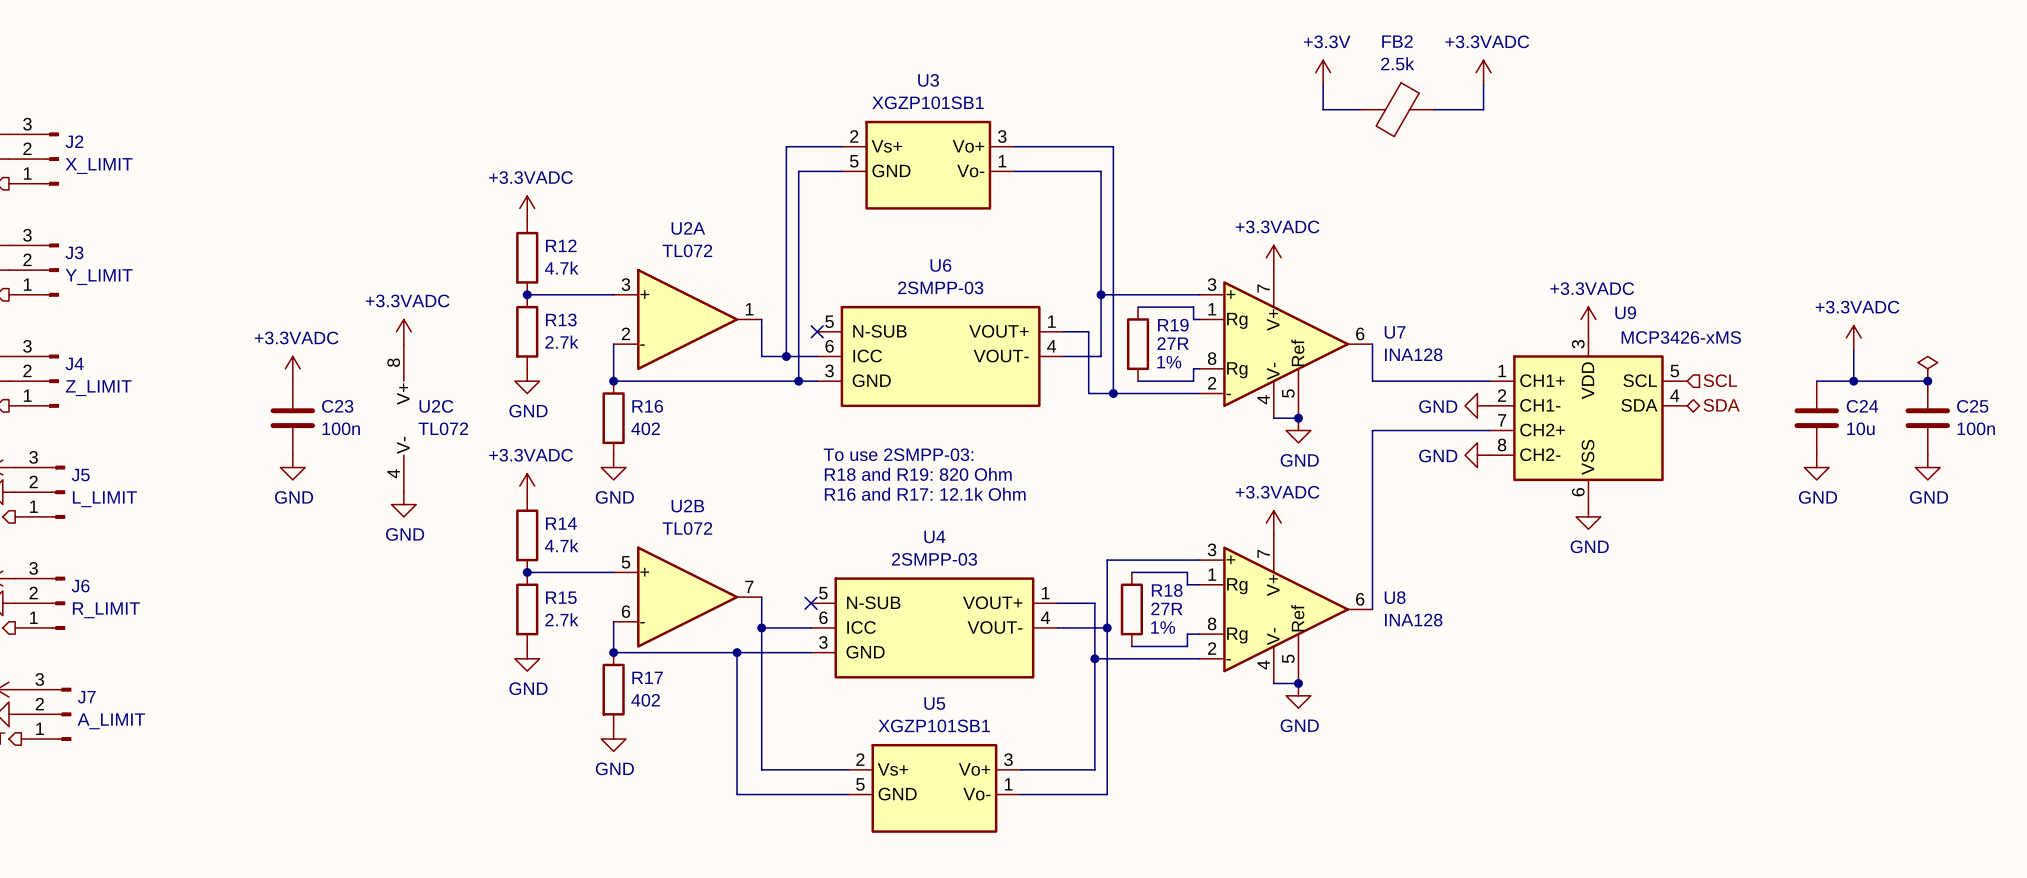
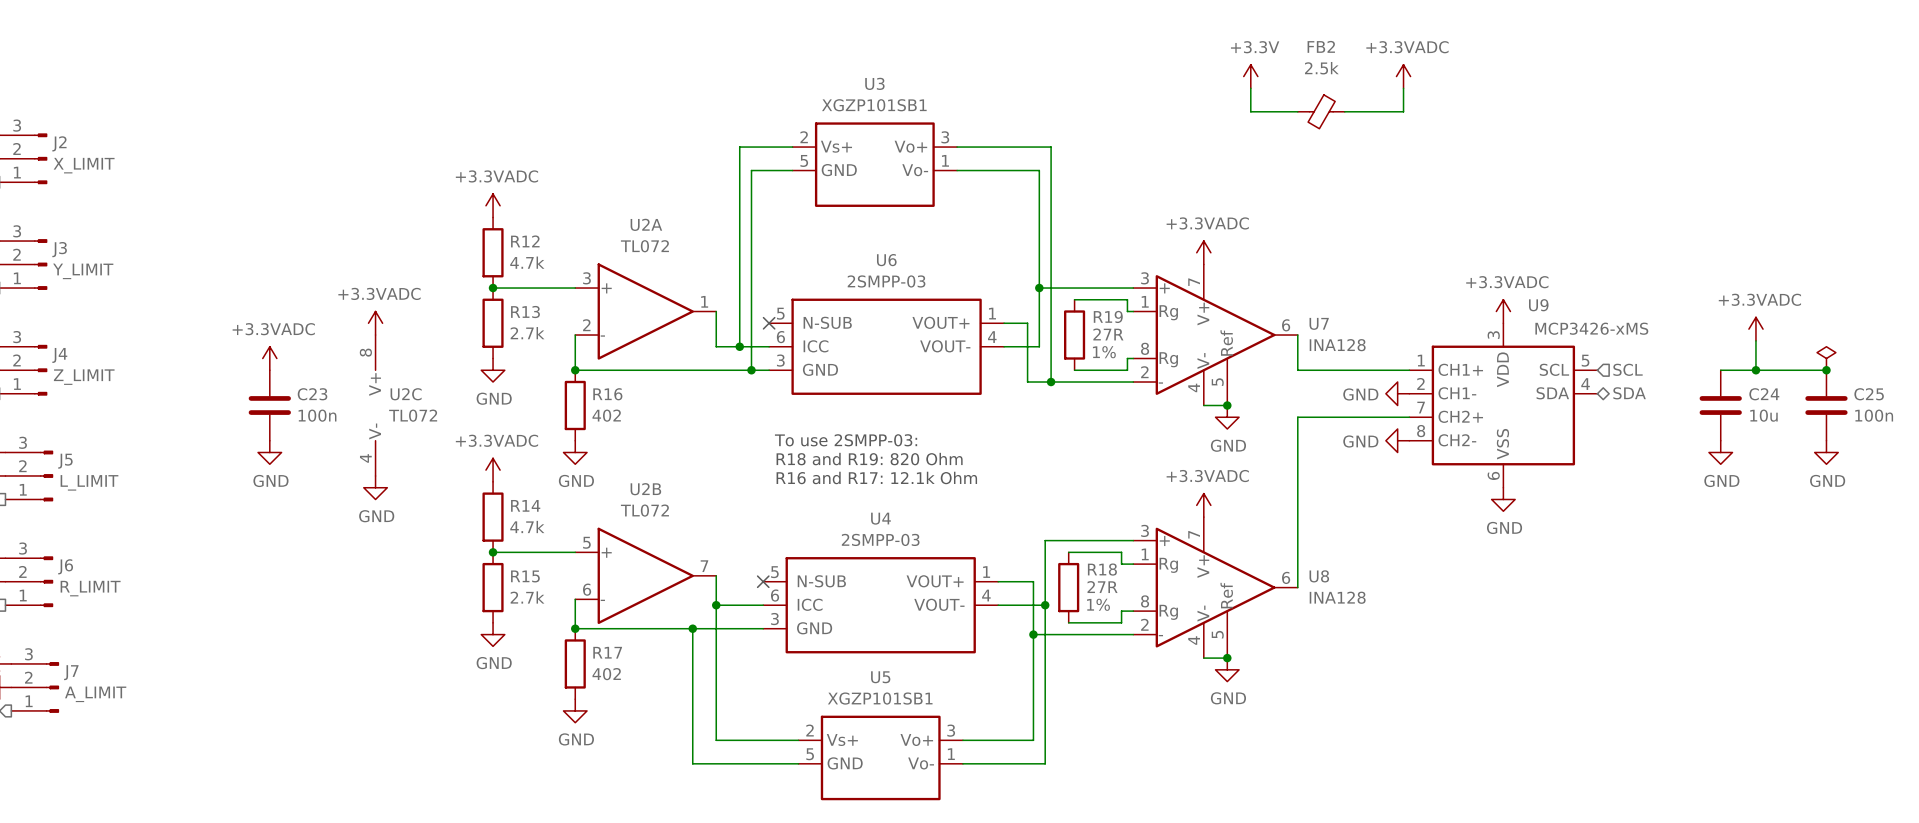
FB2 symbol: [1360, 82, 1435, 137] -> [1297, 94, 1345, 129]

